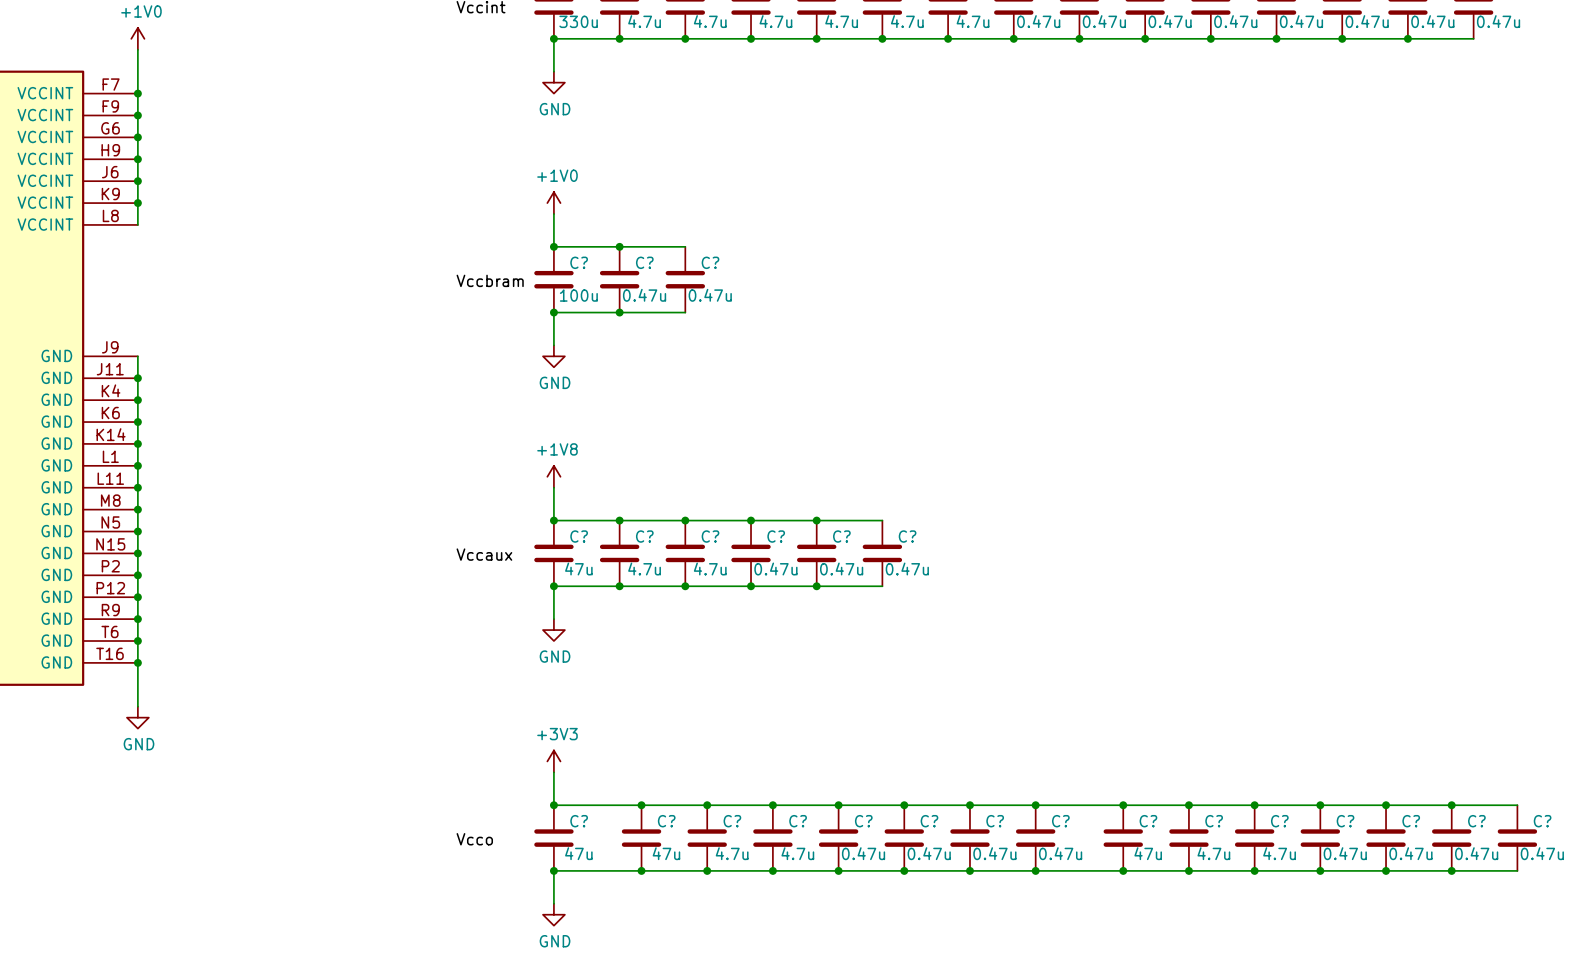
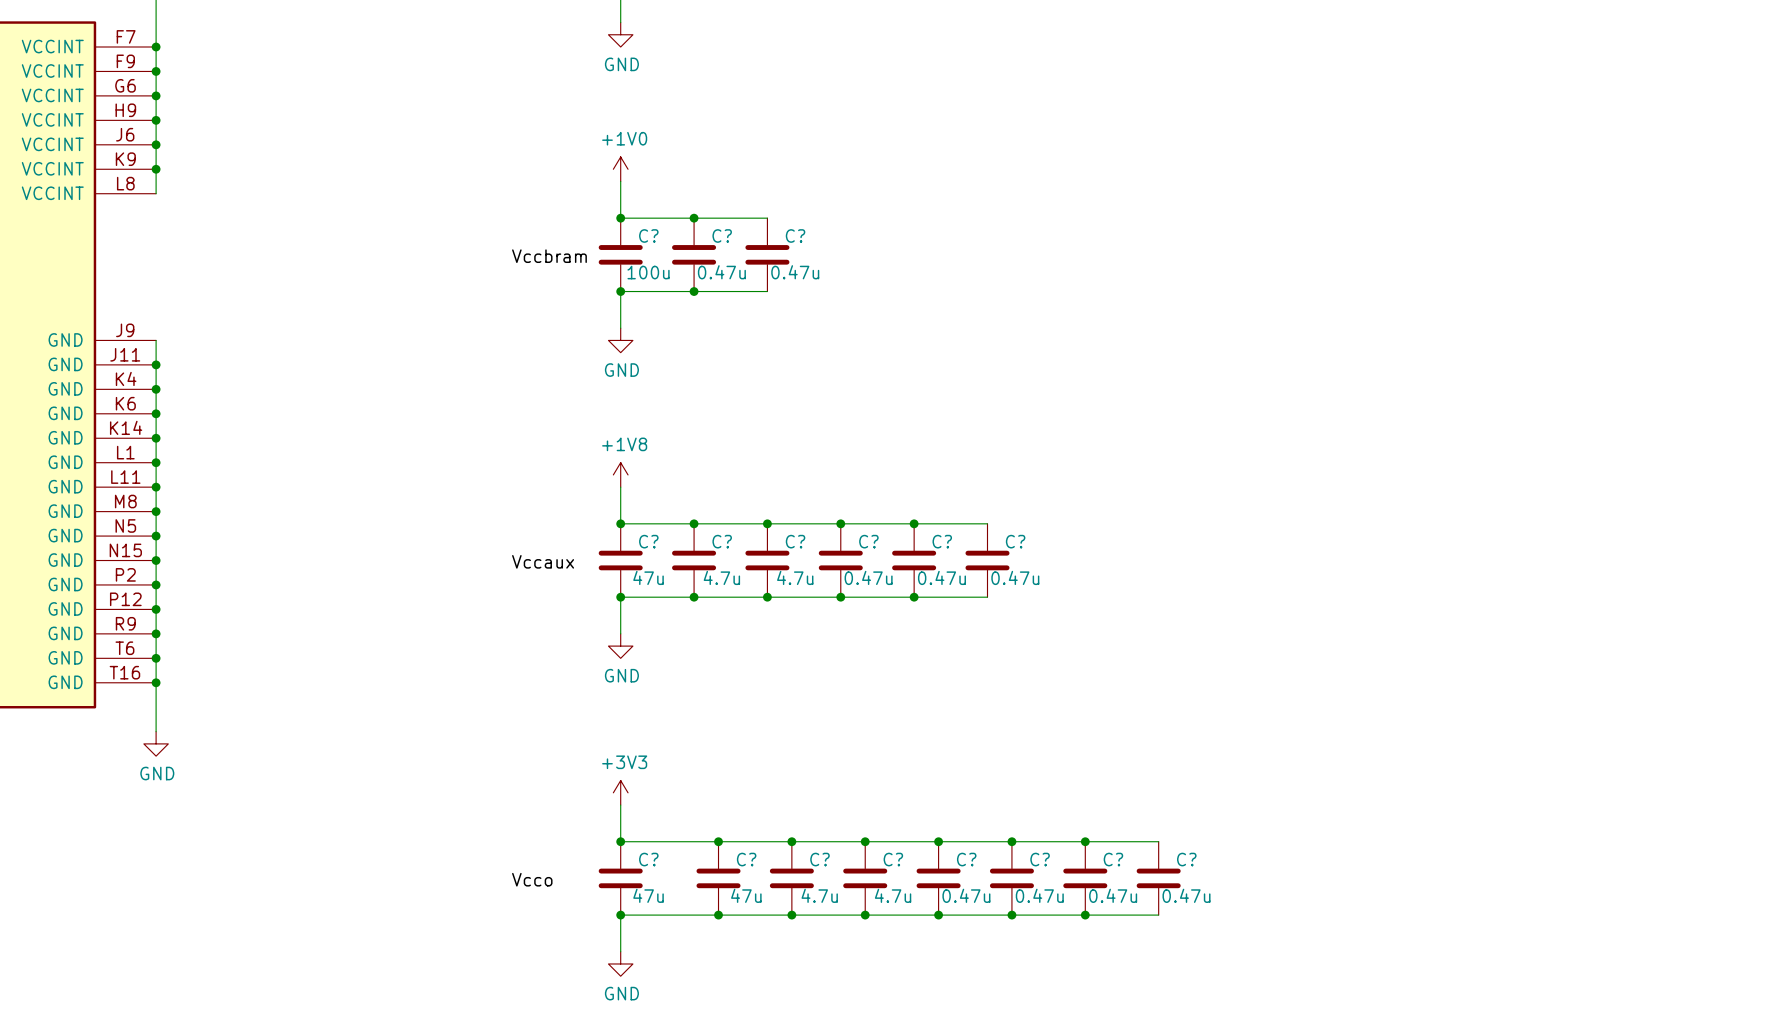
wire: (1035, 805) (1517, 805) -> none
junction: (1035, 805) -> none
junction: (1123, 805) -> none
junction: (1188, 805) -> none
junction: (1254, 805) -> none
junction: (1320, 805) -> none
junction: (1386, 805) -> none
junction: (1451, 805) -> none
C?: 47u (1123, 838) -> none
C?: 4.7u (1188, 838) -> none
C?: 4.7u (1254, 838) -> none
C?: 0.47u (1320, 838) -> none
C?: 0.47u (1386, 838) -> none
C?: 0.47u (1451, 838) -> none
C?: 0.47u (1517, 838) -> none
wire: (1035, 870) (1517, 870) -> none
junction: (1035, 870) -> none
junction: (1123, 870) -> none
junction: (1188, 870) -> none
junction: (1254, 870) -> none
junction: (1320, 870) -> none
junction: (1386, 870) -> none
junction: (1451, 870) -> none

